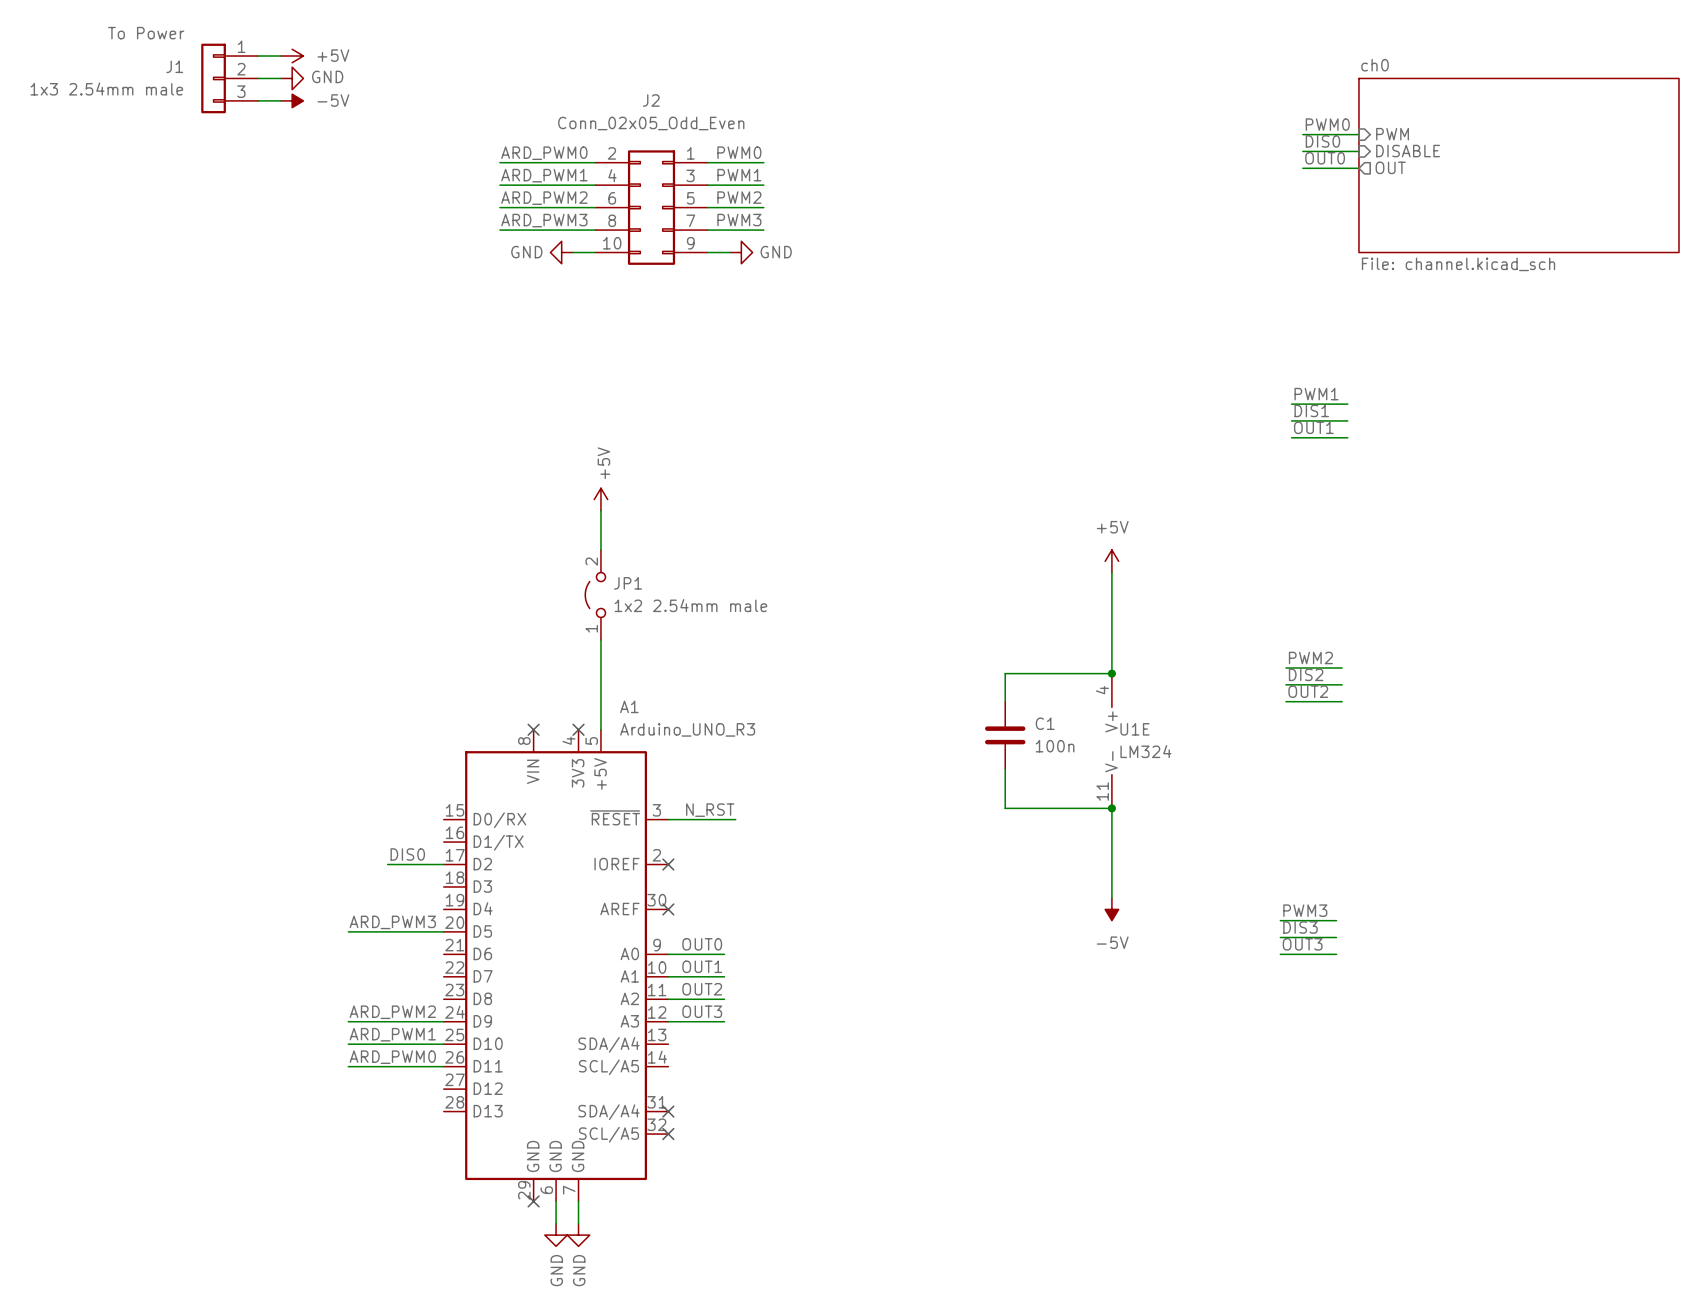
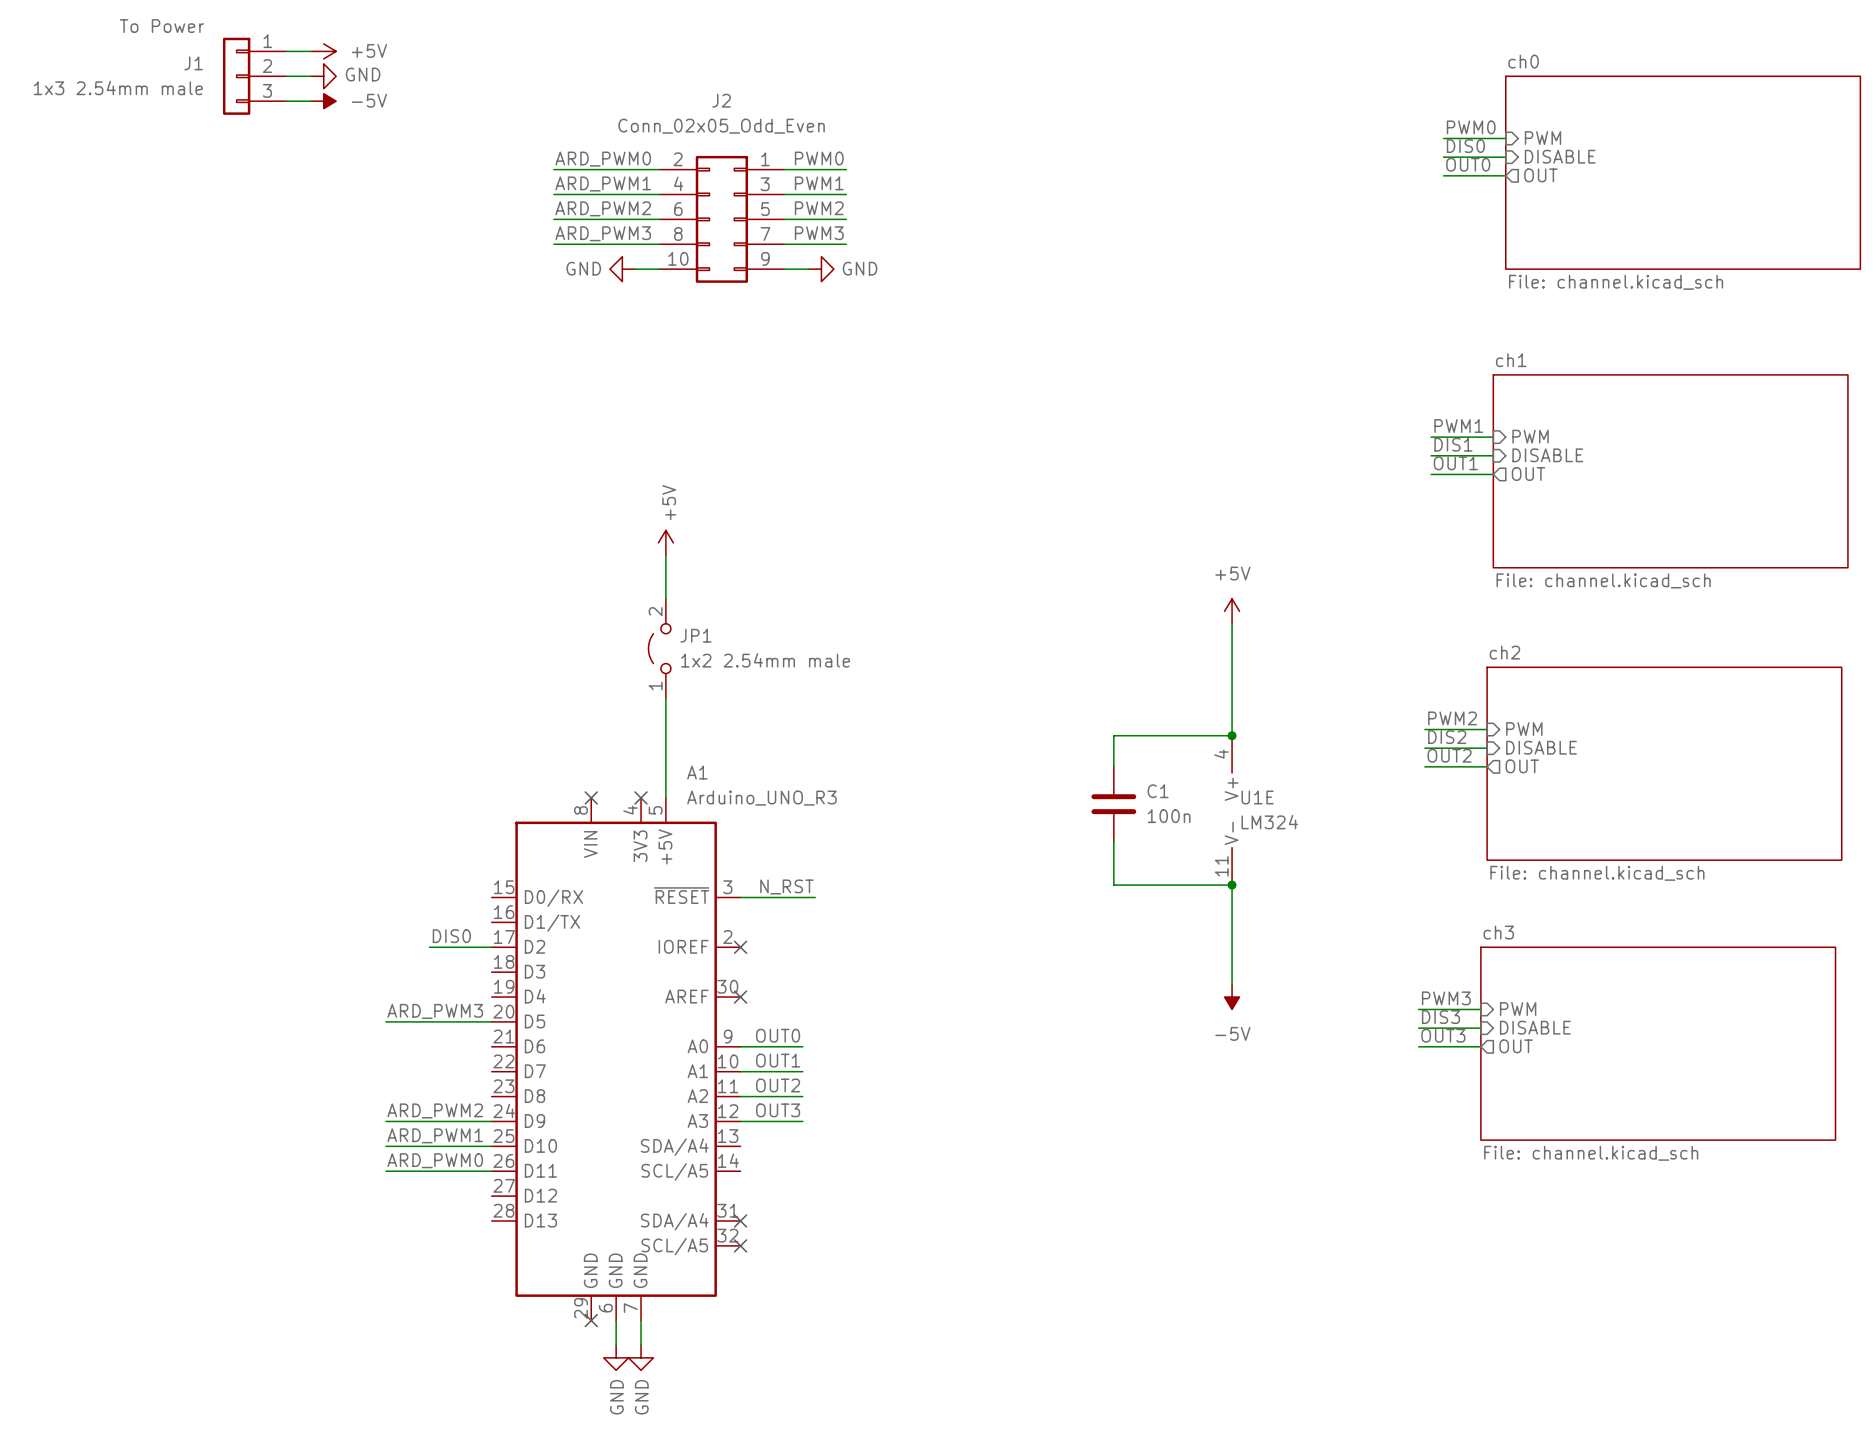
sheet pin: none -> PWM (1530, 436)
sheet pin: none -> DISABLE (1547, 455)
sheet ch1: none -> File: channel.kicad_sch (1670, 471)
sheet pin: none -> OUT (1528, 473)
sheet pin: none -> PWM (1524, 729)
sheet pin: none -> DISABLE (1541, 747)
sheet ch2: none -> File: channel.kicad_sch (1664, 763)
sheet pin: none -> OUT (1522, 766)
sheet pin: none -> PWM (1518, 1009)
sheet pin: none -> DISABLE (1535, 1027)
sheet ch3: none -> File: channel.kicad_sch (1658, 1043)
sheet pin: none -> OUT (1516, 1046)

